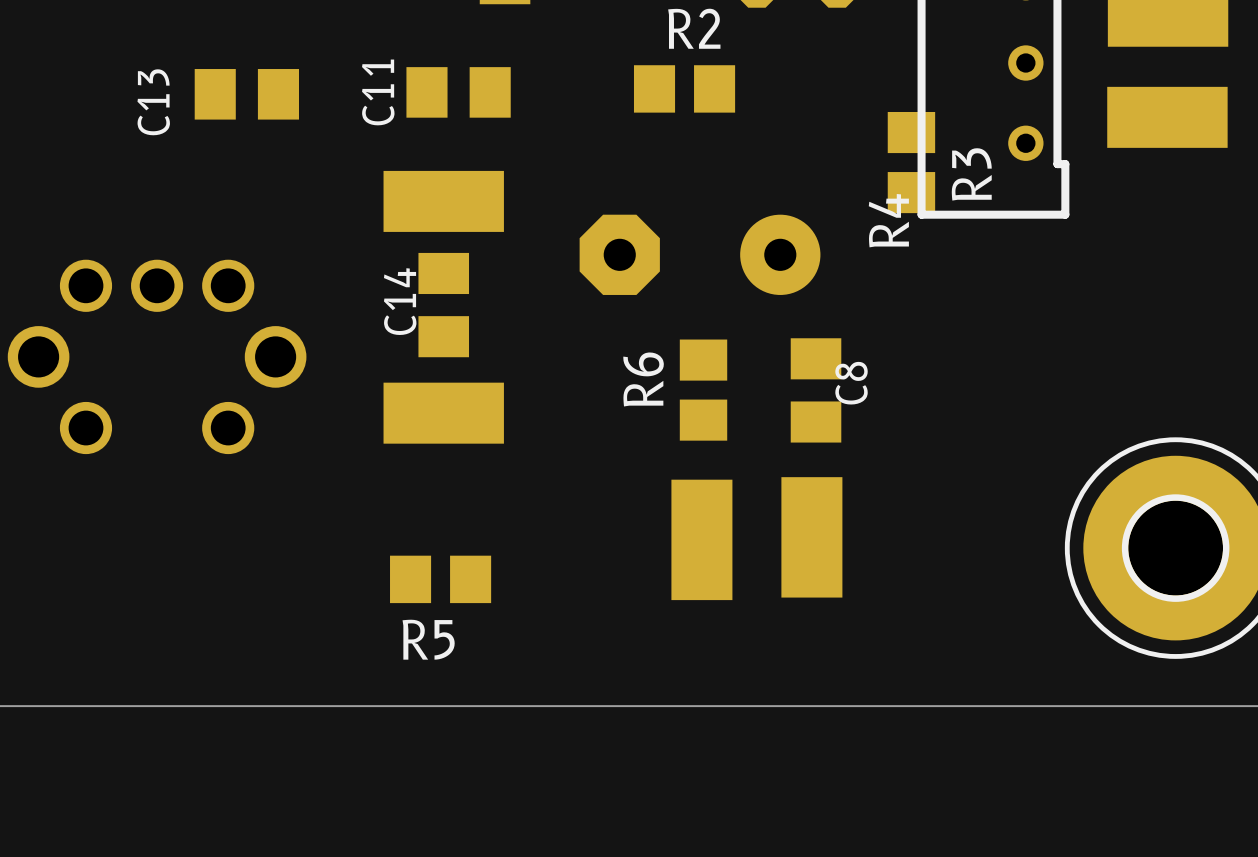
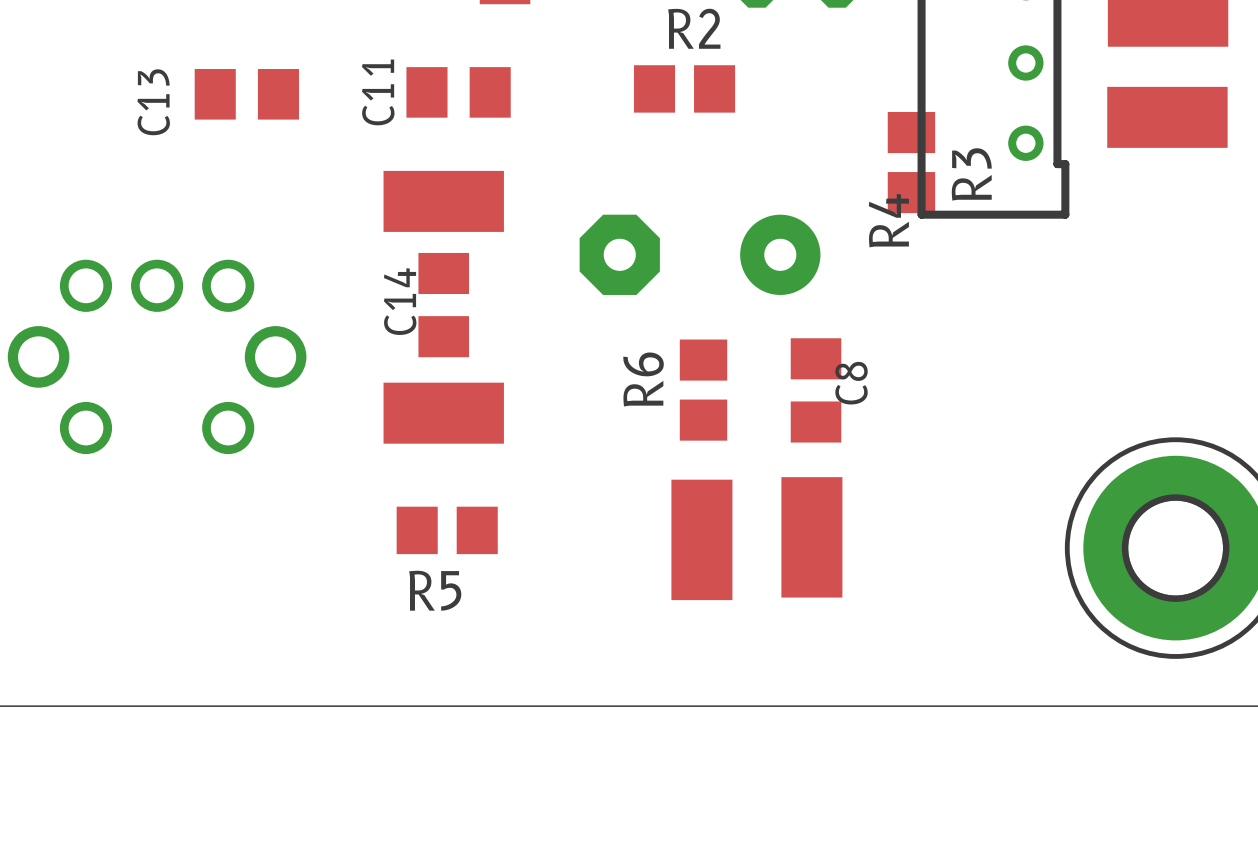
R5 position: (440, 579) -> (447, 530)

